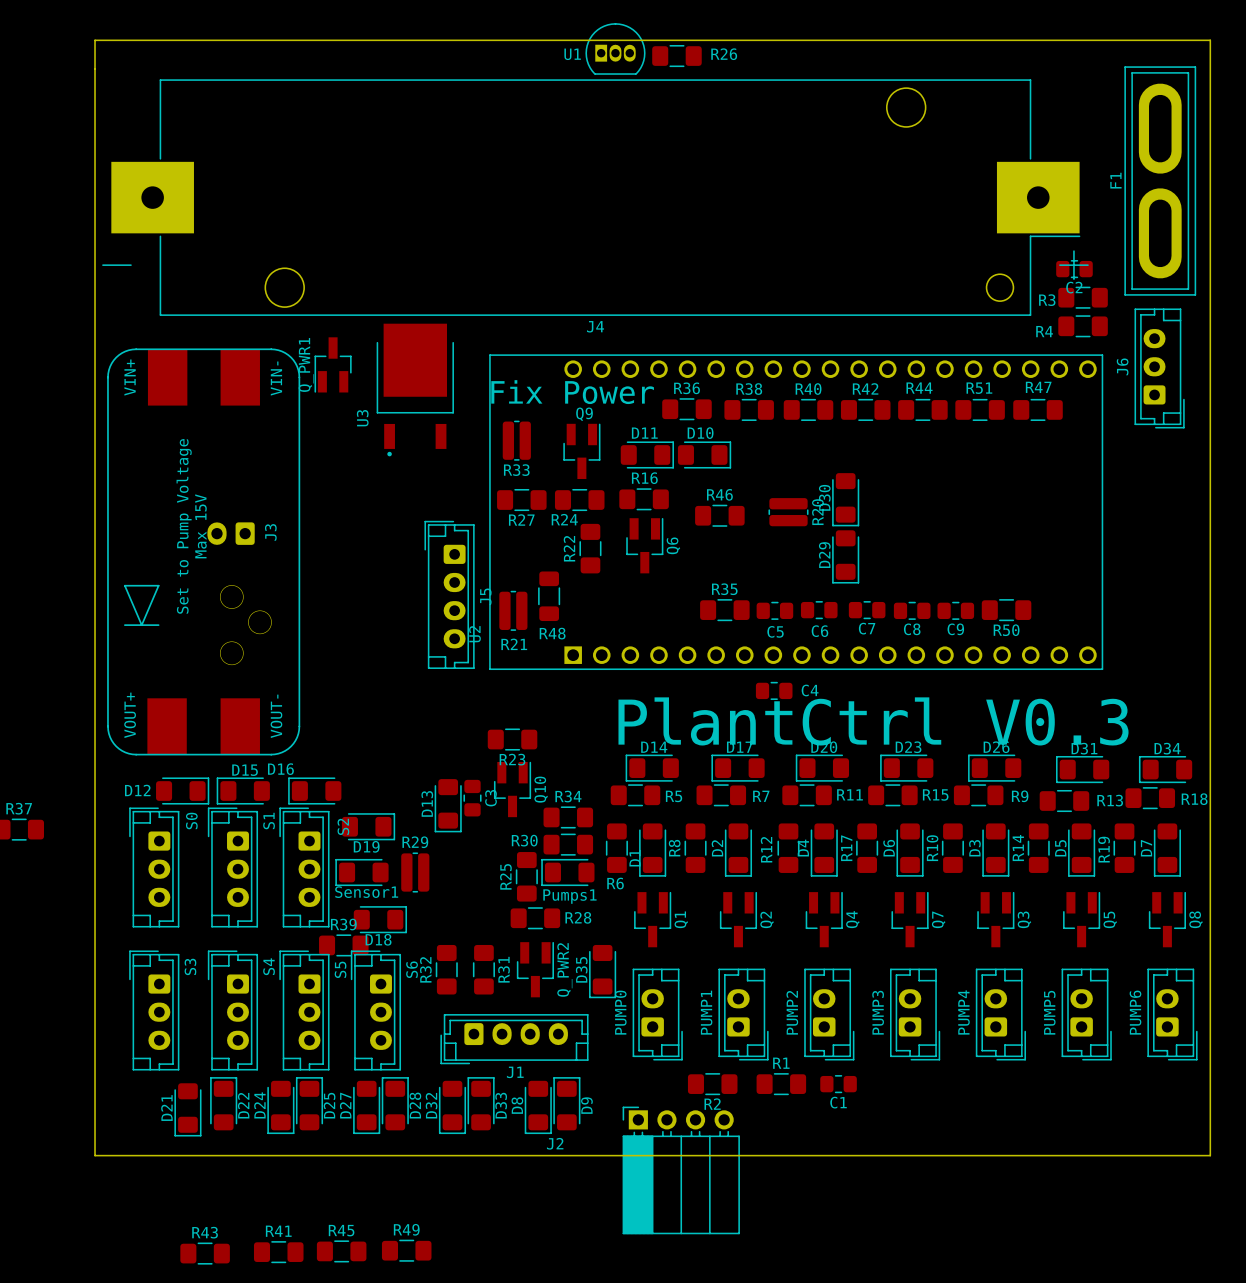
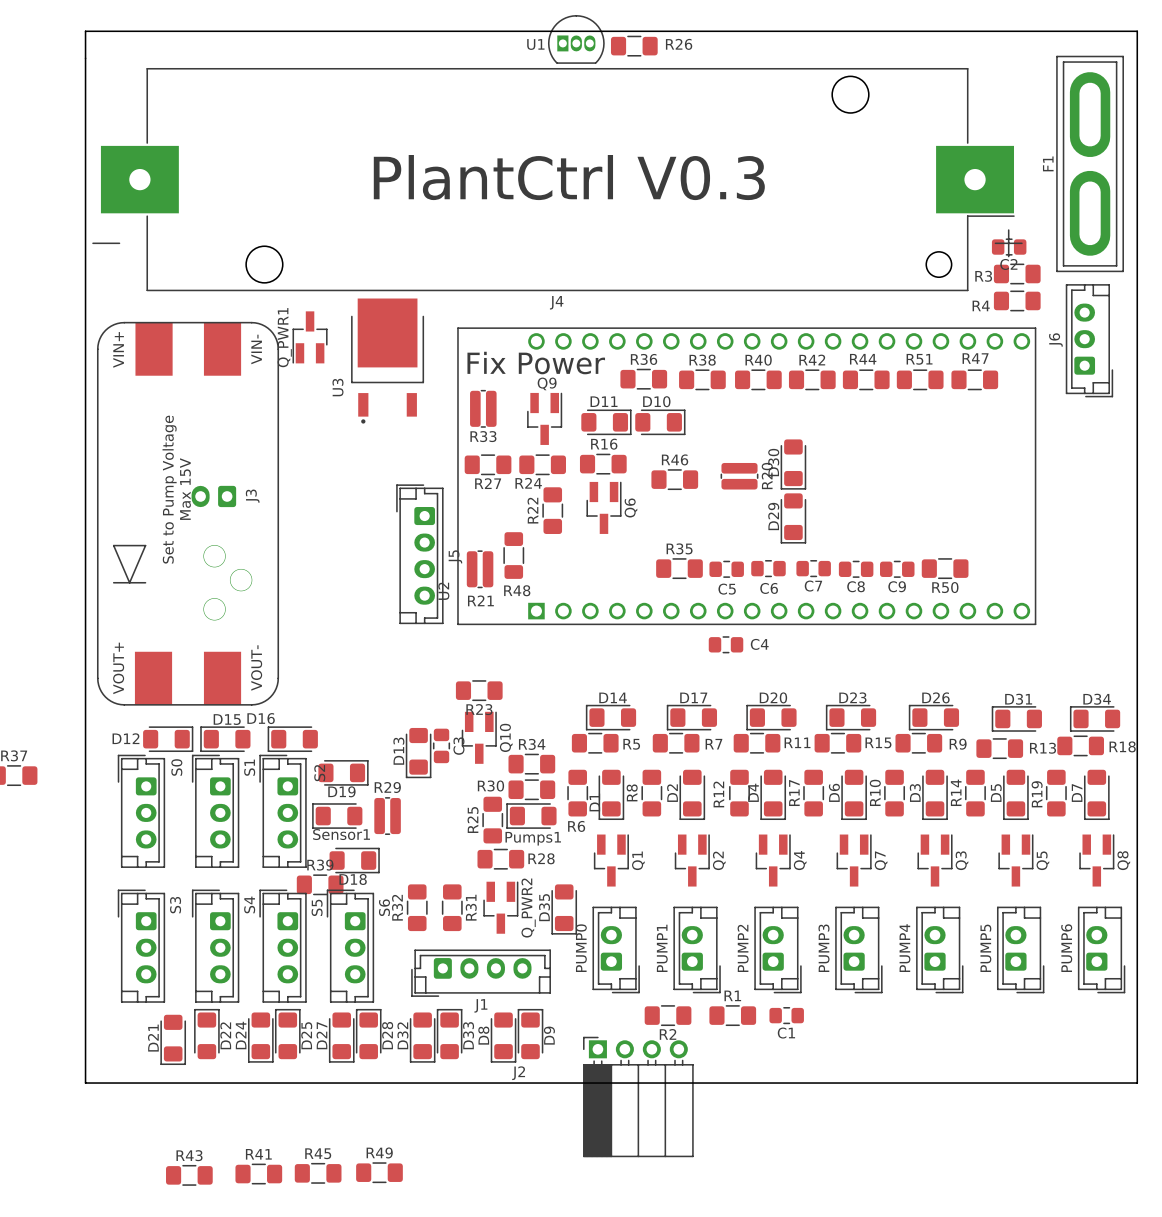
text: none -> PlantCtrl V0.3 (569, 177)
text: PlantCtrl V0.3 (873, 721) -> none

